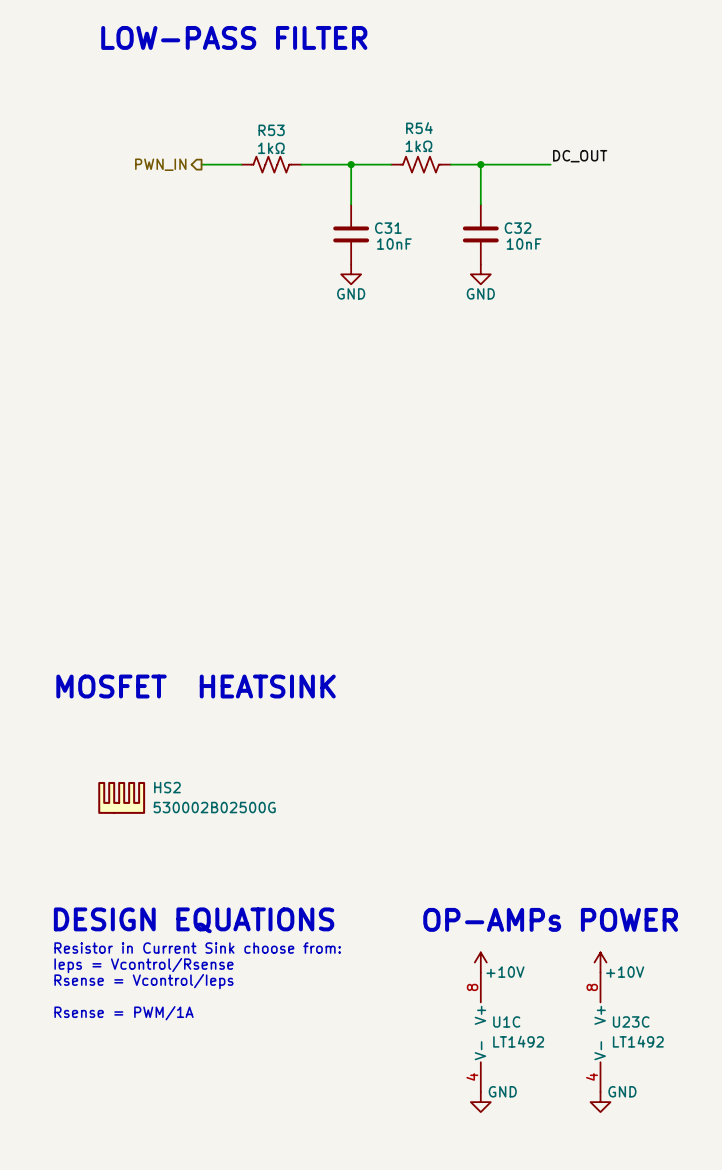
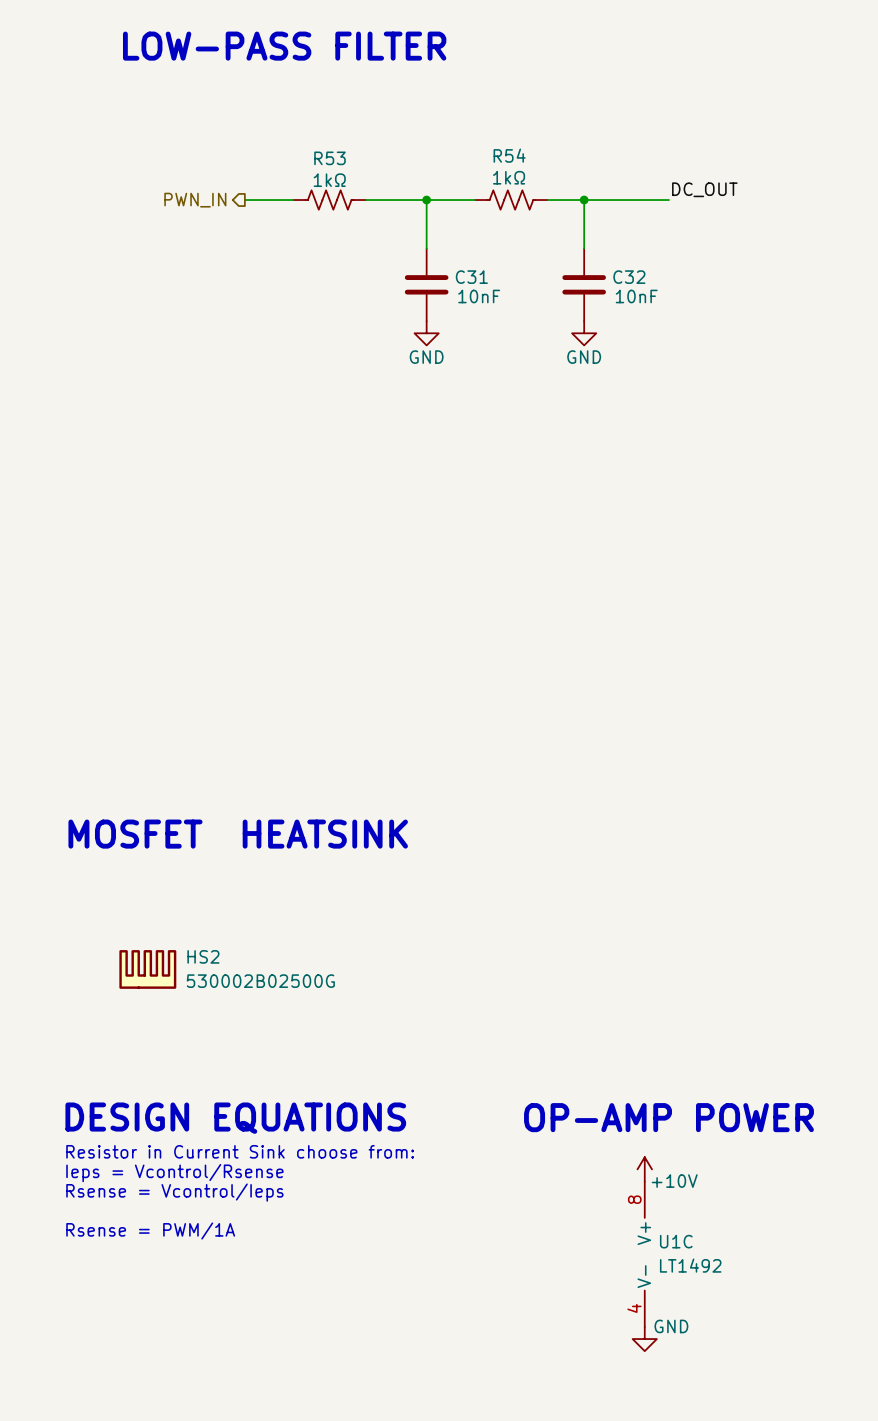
text: OP-AMPs POWER (550, 919) -> OP-AMP POWER (668, 1117)
power symbol: +10V (480, 962) -> none
power symbol: none -> +10V (644, 1169)
power symbol: +10V (600, 962) -> none
U1C position: (480, 1032) -> (644, 1254)
U23C: LT1492 (600, 1032) -> none
power symbol: GND (480, 1102) -> none
power symbol: none -> GND (644, 1339)
power symbol: GND (600, 1102) -> none

